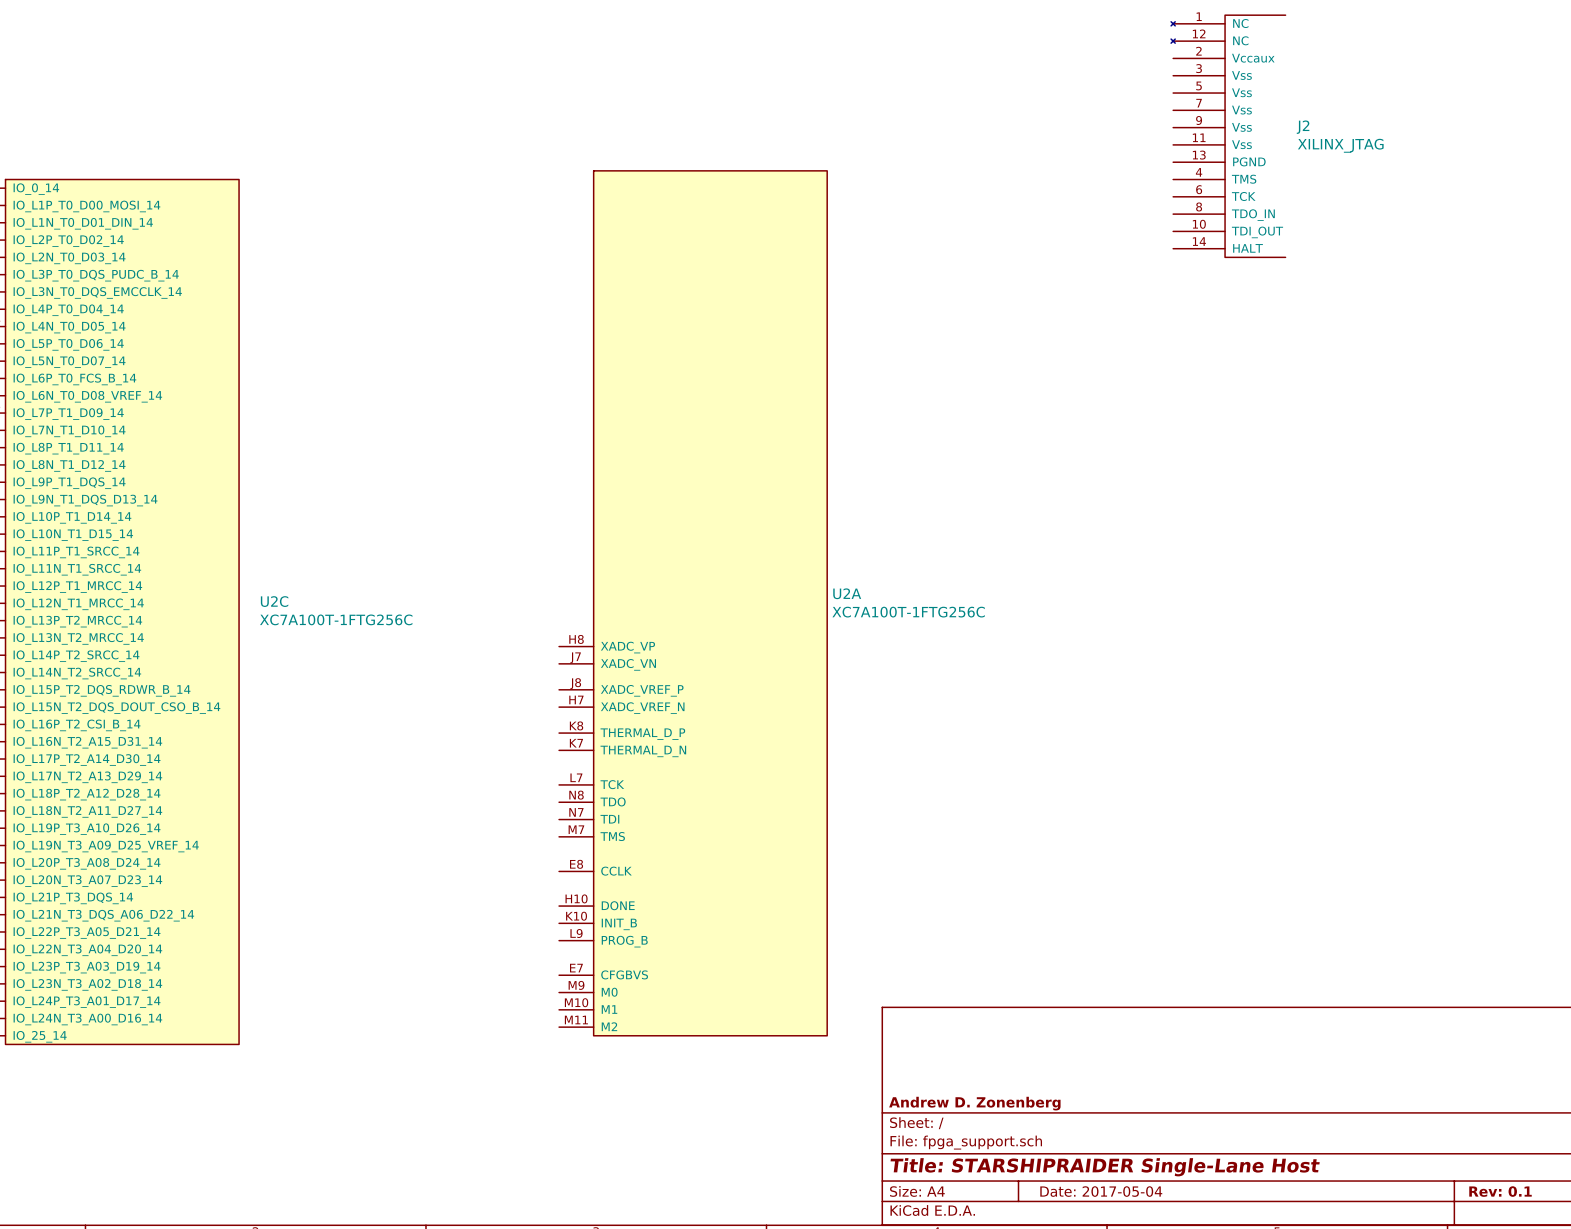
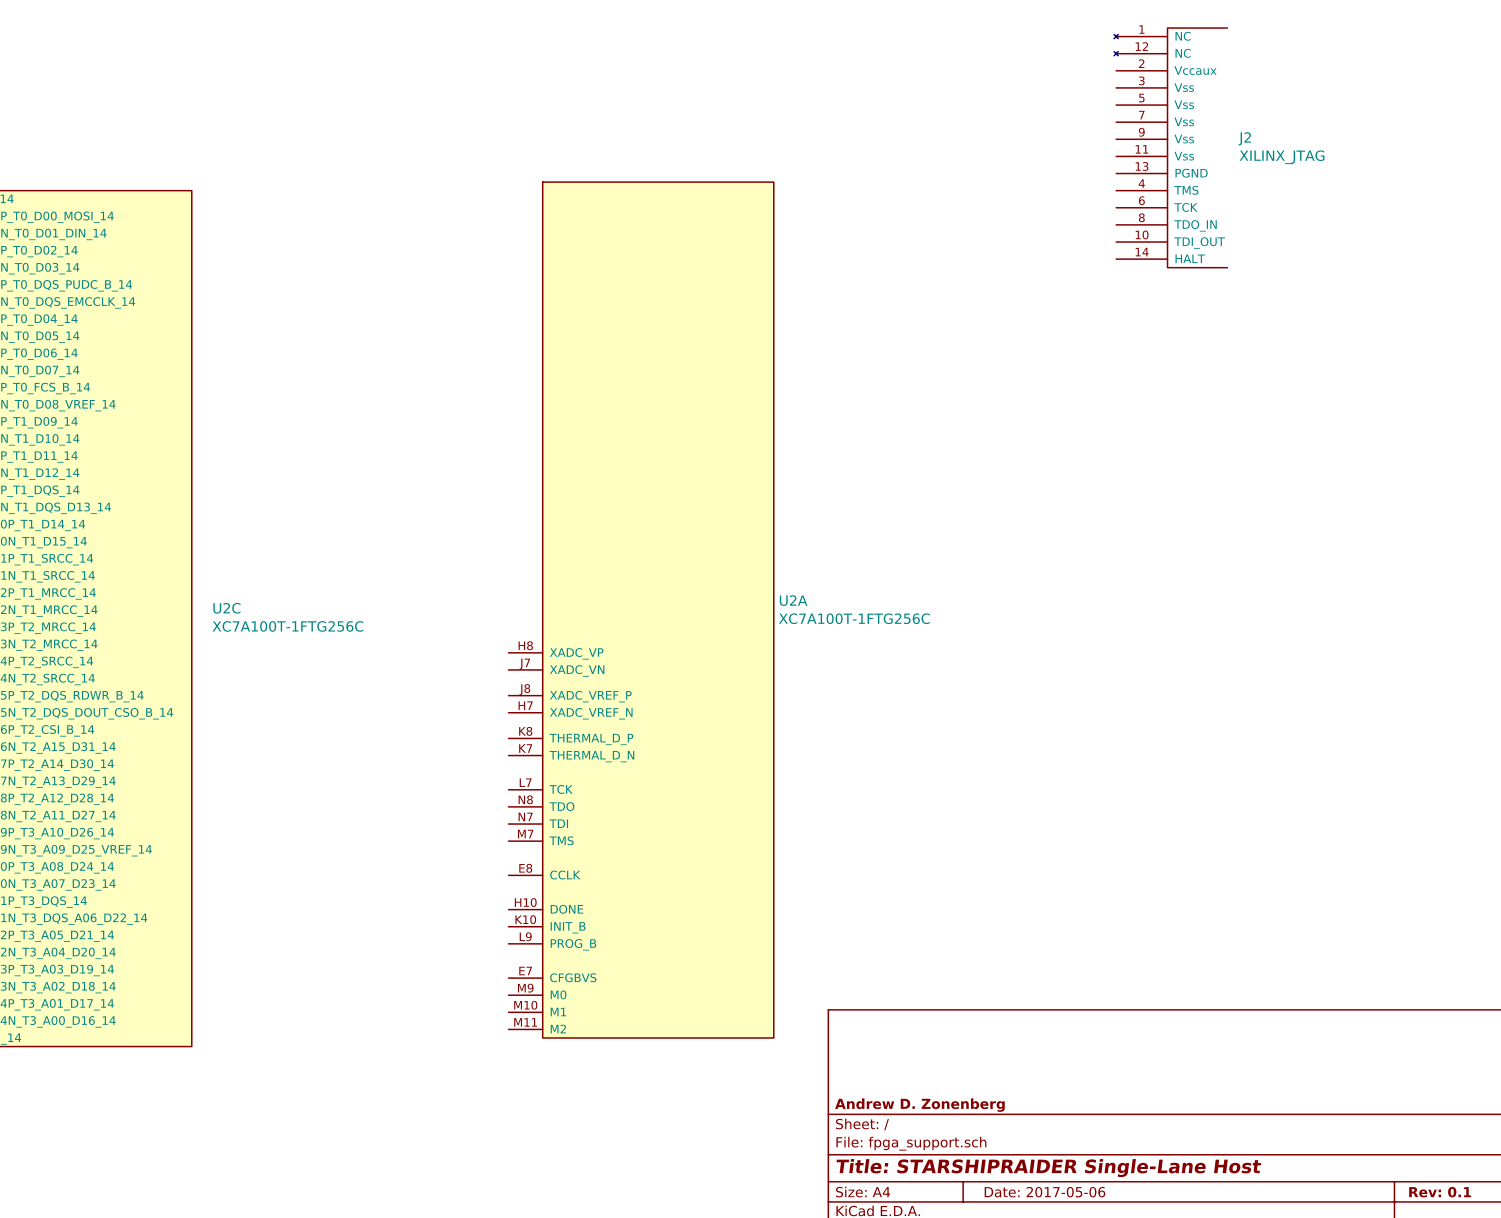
title block: Date: 2017-05-04 (1101, 1191) -> Date: 2017-05-06 (1044, 1192)

